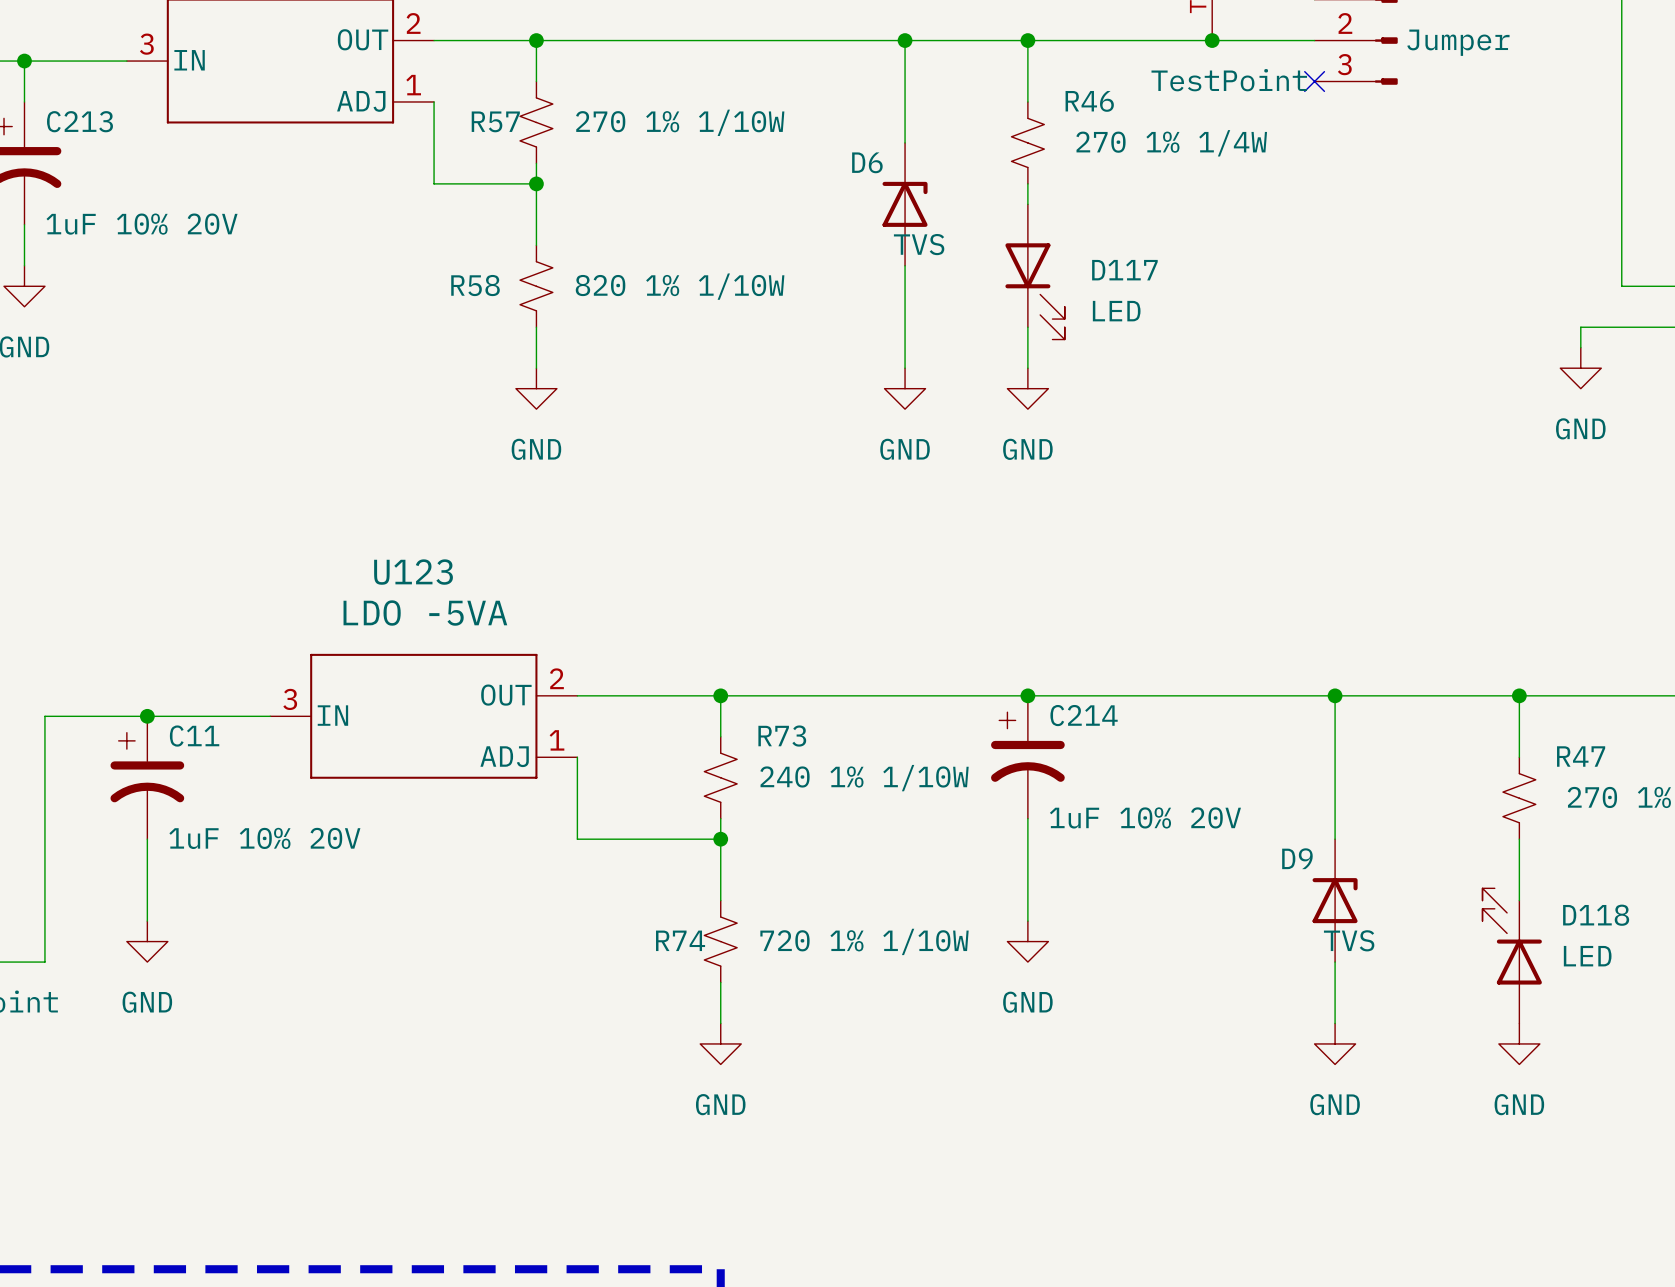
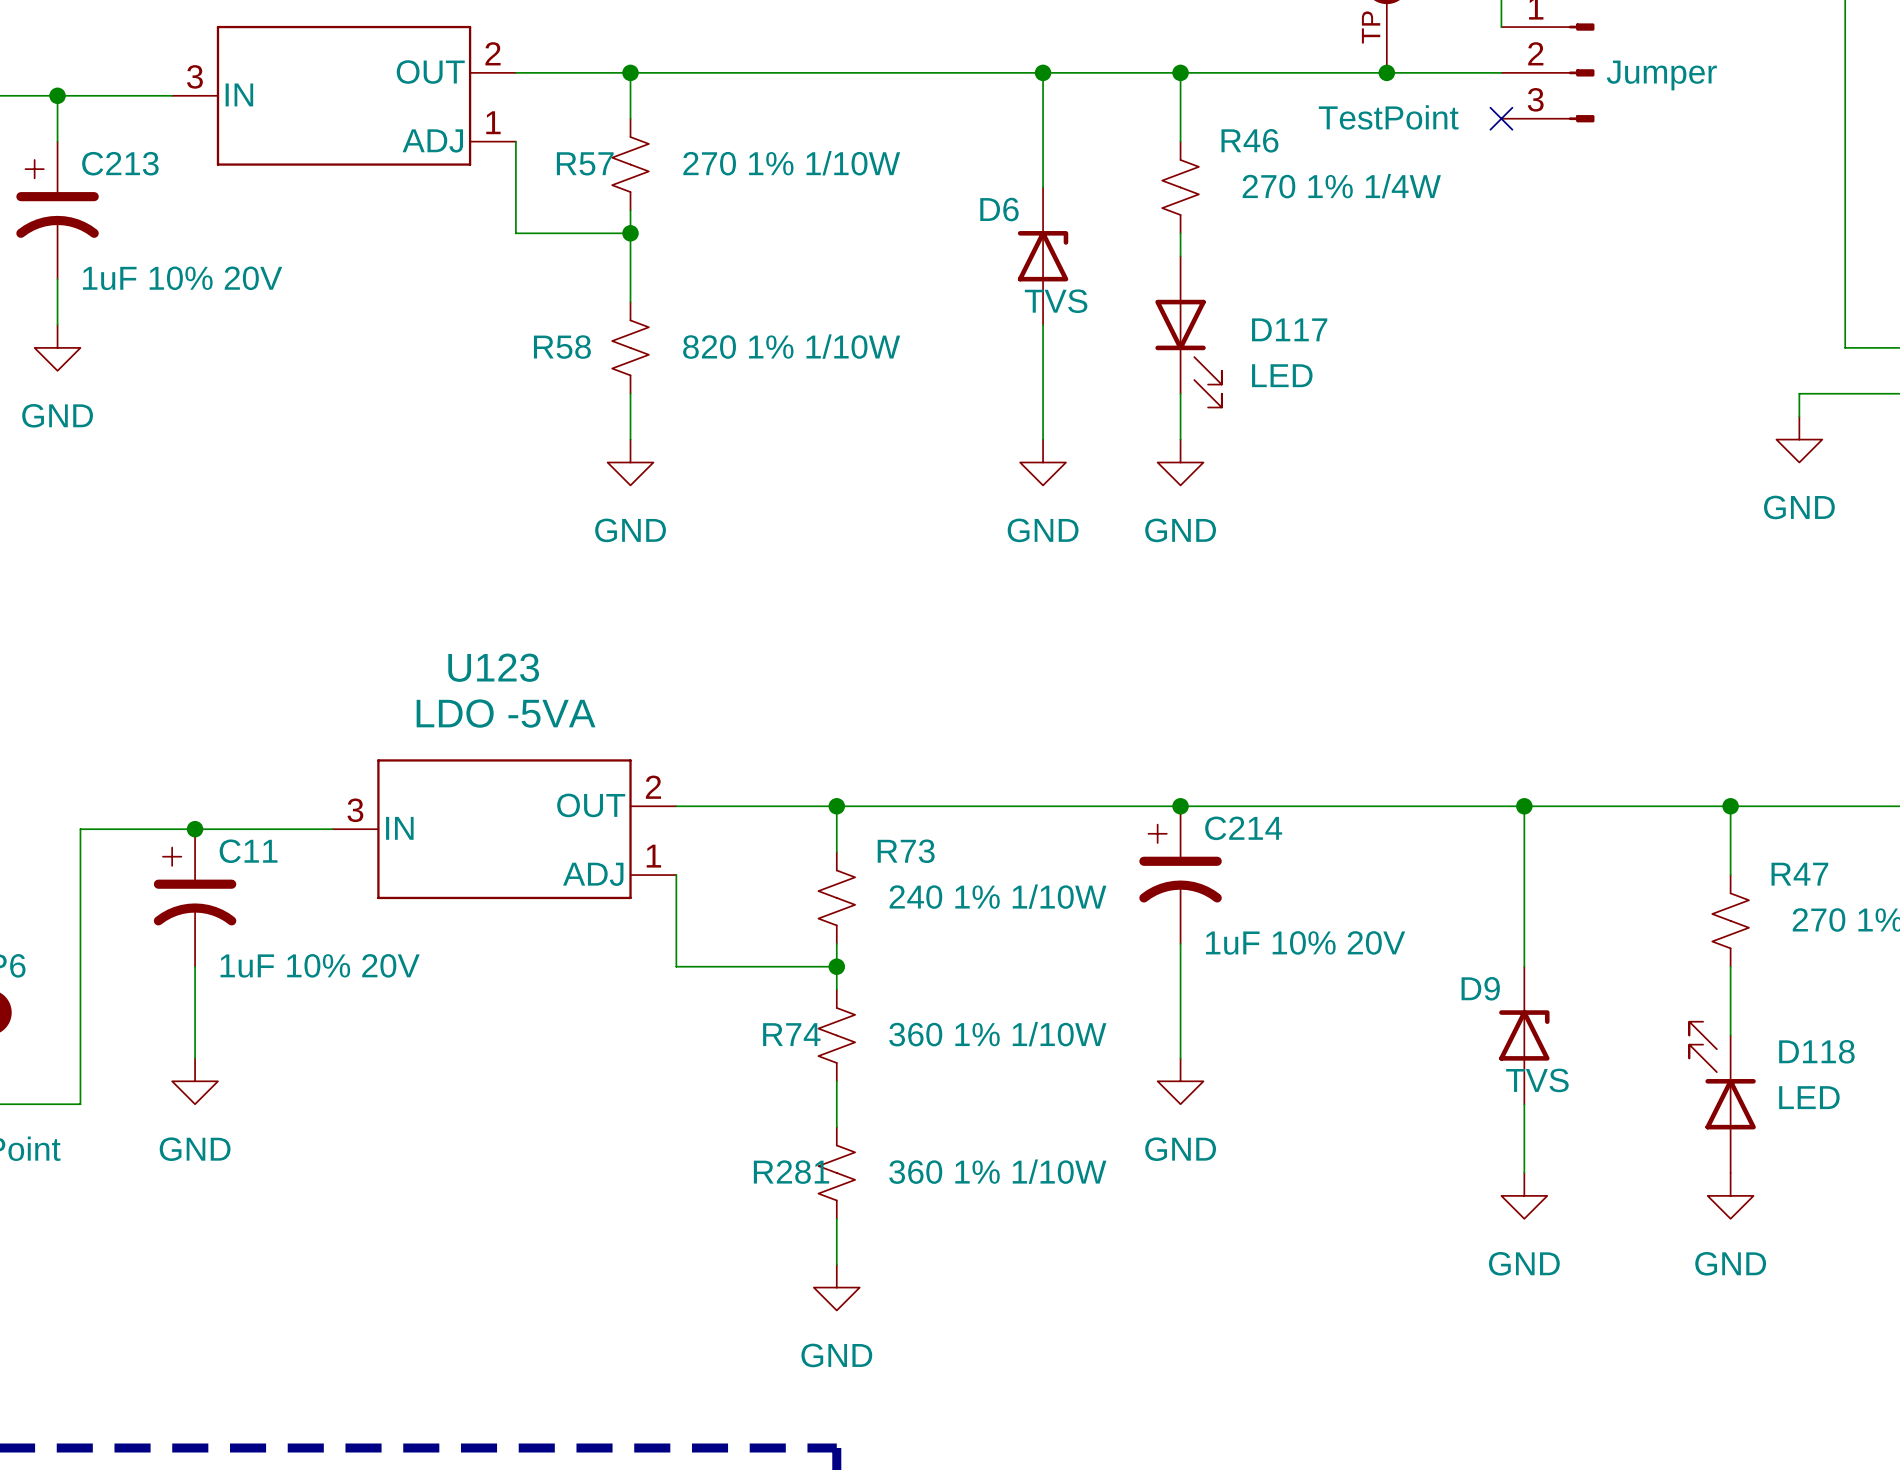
wire: (720, 859) (720, 900) -> (836, 1218) (836, 1264)
R74 position: (720, 941) -> (836, 1035)
R74 value: 720 1% 1/10W (864, 941) -> 360 1% 1/10W (997, 1034)
wire: (720, 982) (720, 1023) -> (836, 1127) (836, 1081)
R281: none -> 360 1% 1/10W (836, 1172)
power symbol position: GND (720, 1043) -> GND (836, 1287)

